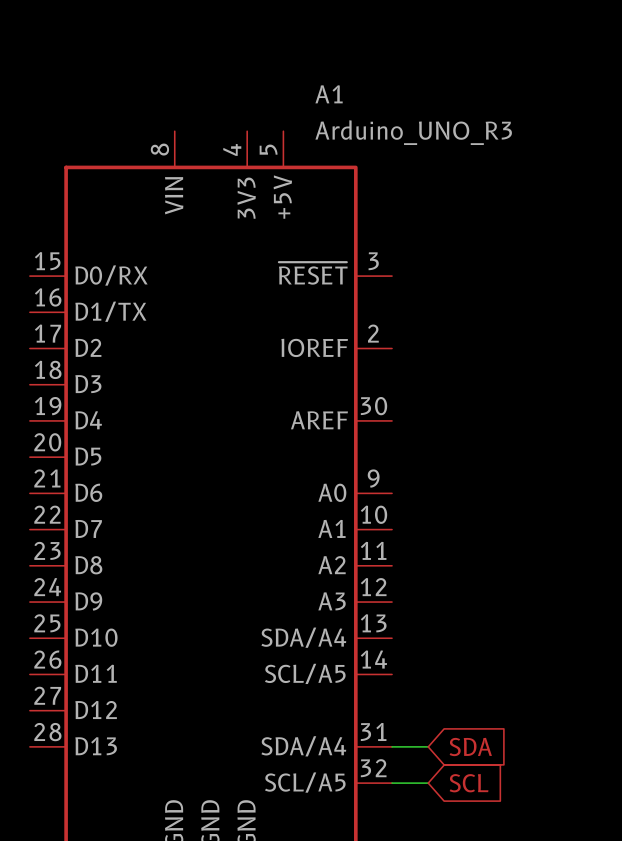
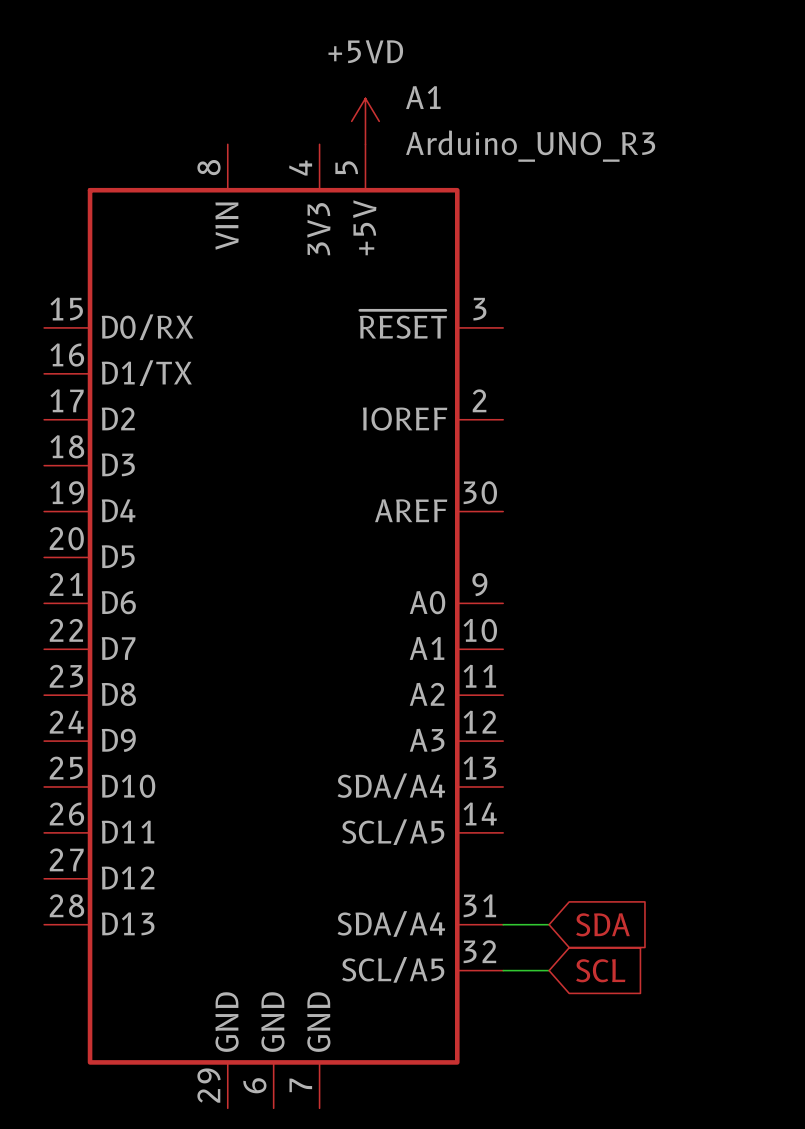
power symbol: none -> +5VD (365, 121)

